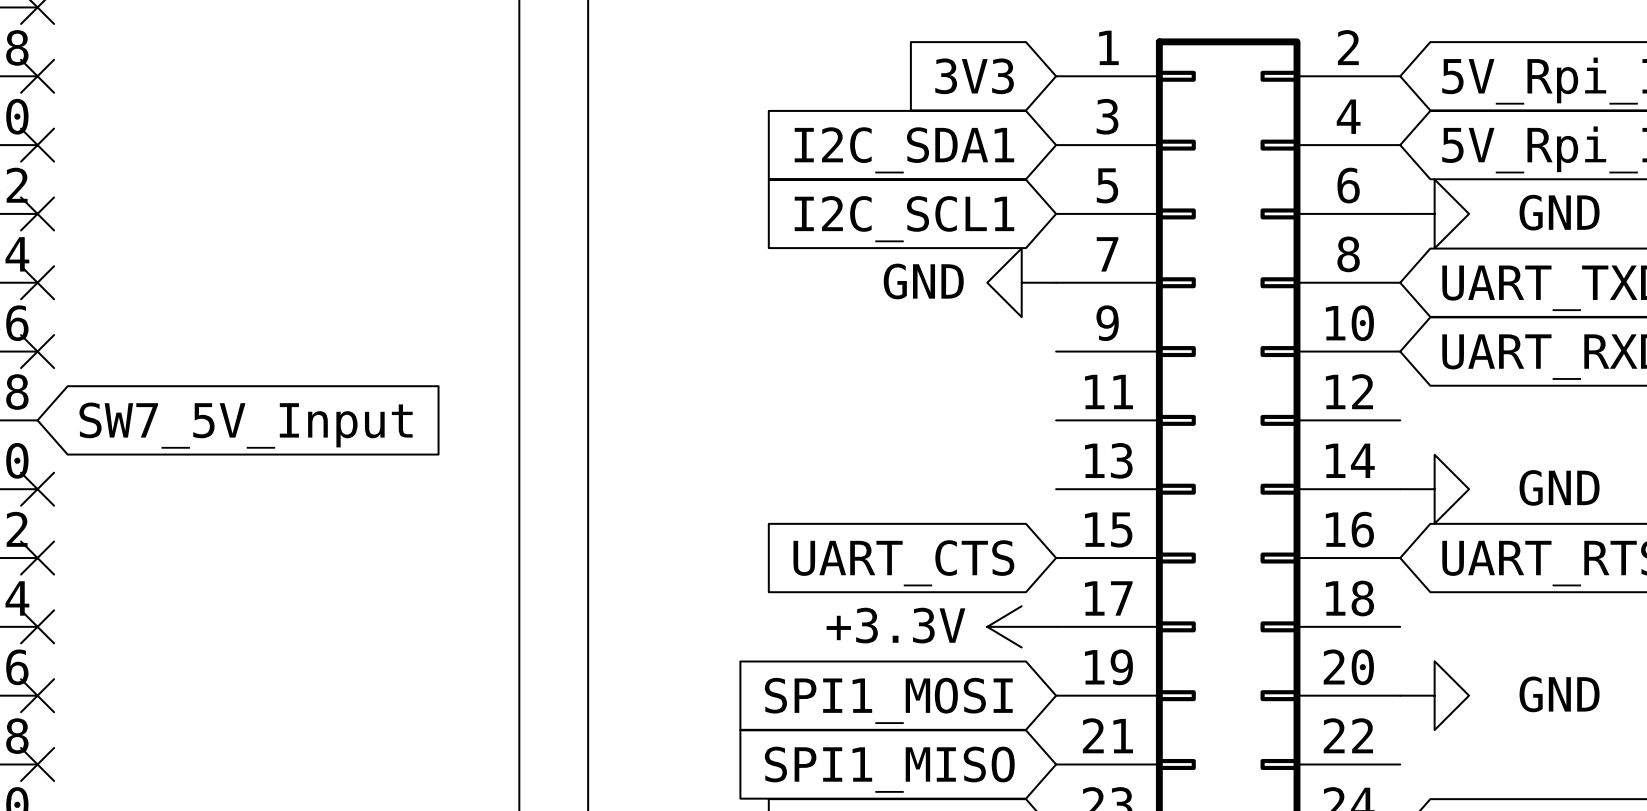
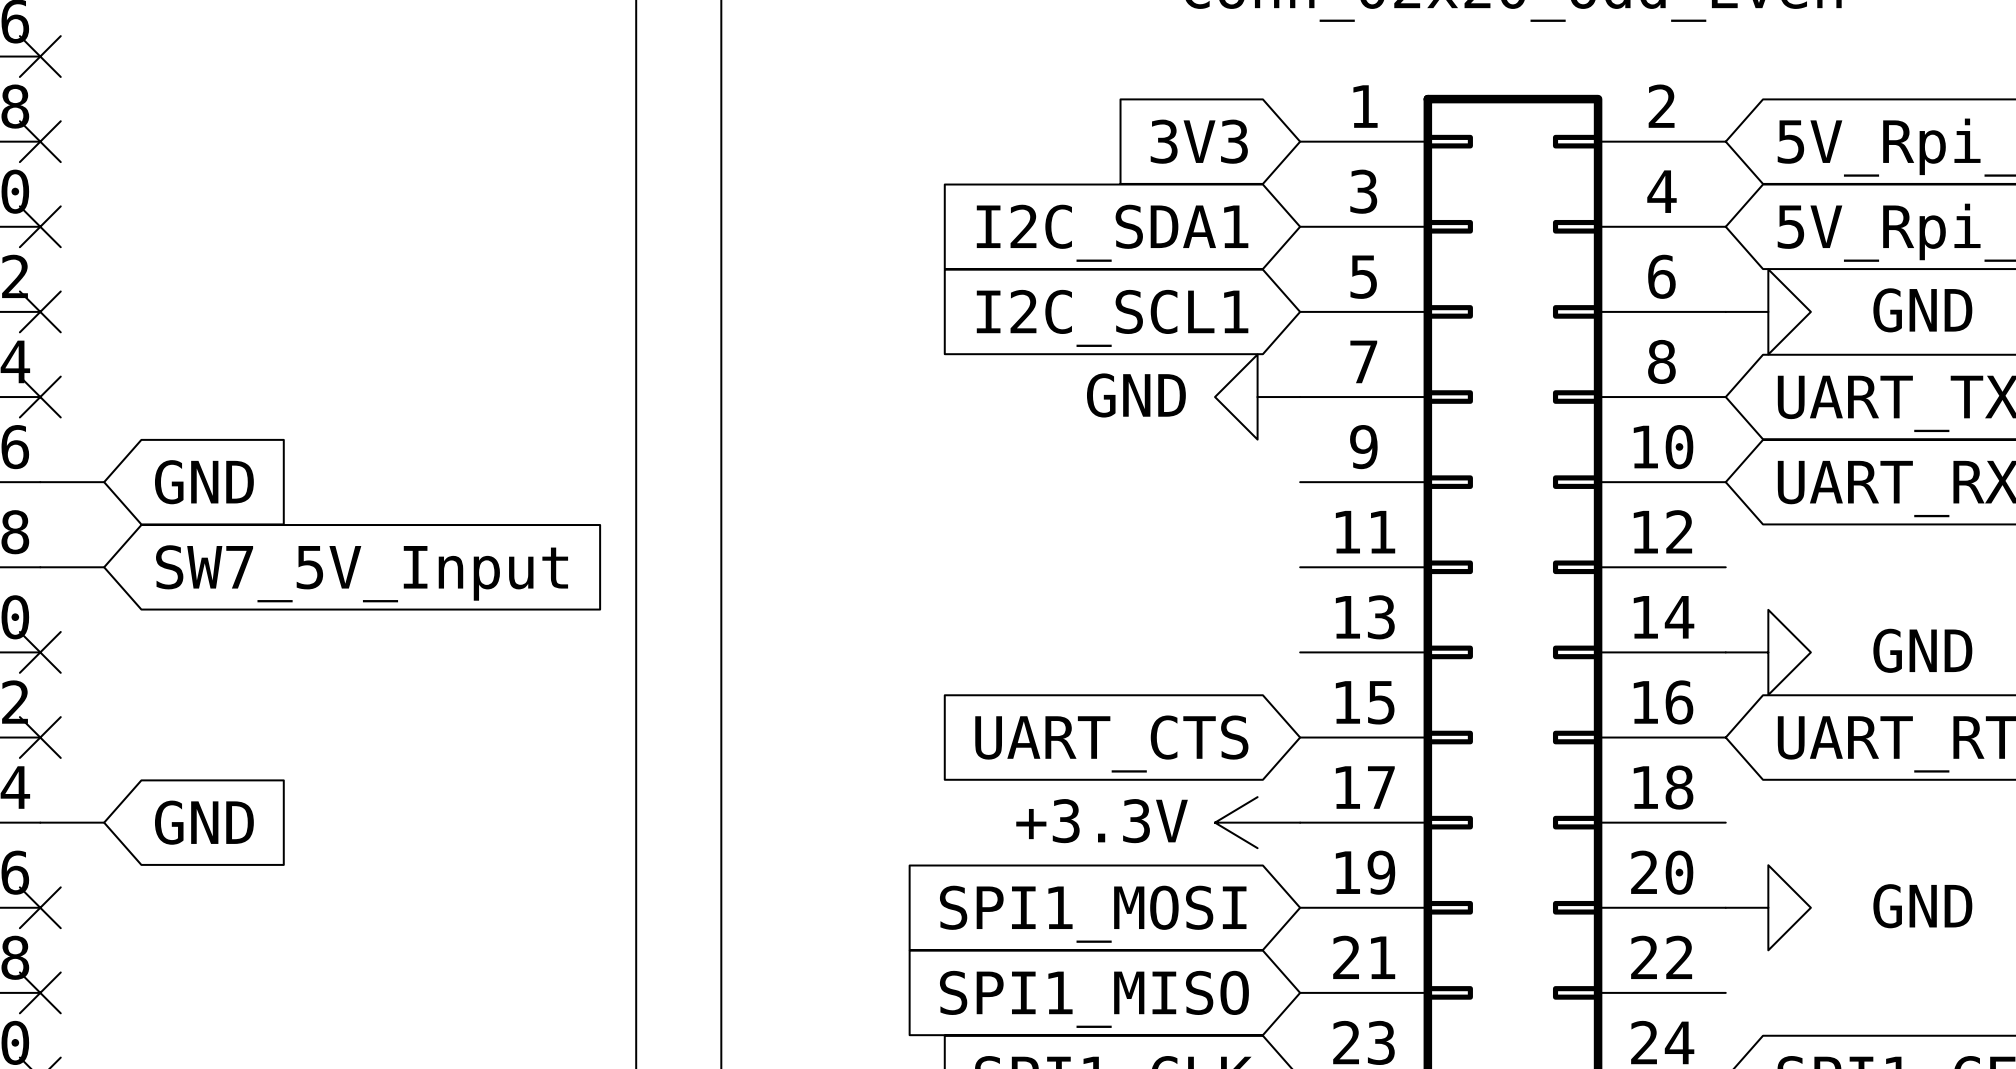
wire: none -> (40, 482) (104, 482)
no-connect mark: (37, 351) -> none
global label: none -> GND (204, 482)
wire: none -> (40, 567) (104, 567)
global label position: SW7_5V_Input (246, 425) -> SW7_5V_Input (362, 573)
wire: none -> (40, 822) (104, 822)
no-connect mark: (37, 626) -> none
global label: none -> GND (204, 822)

